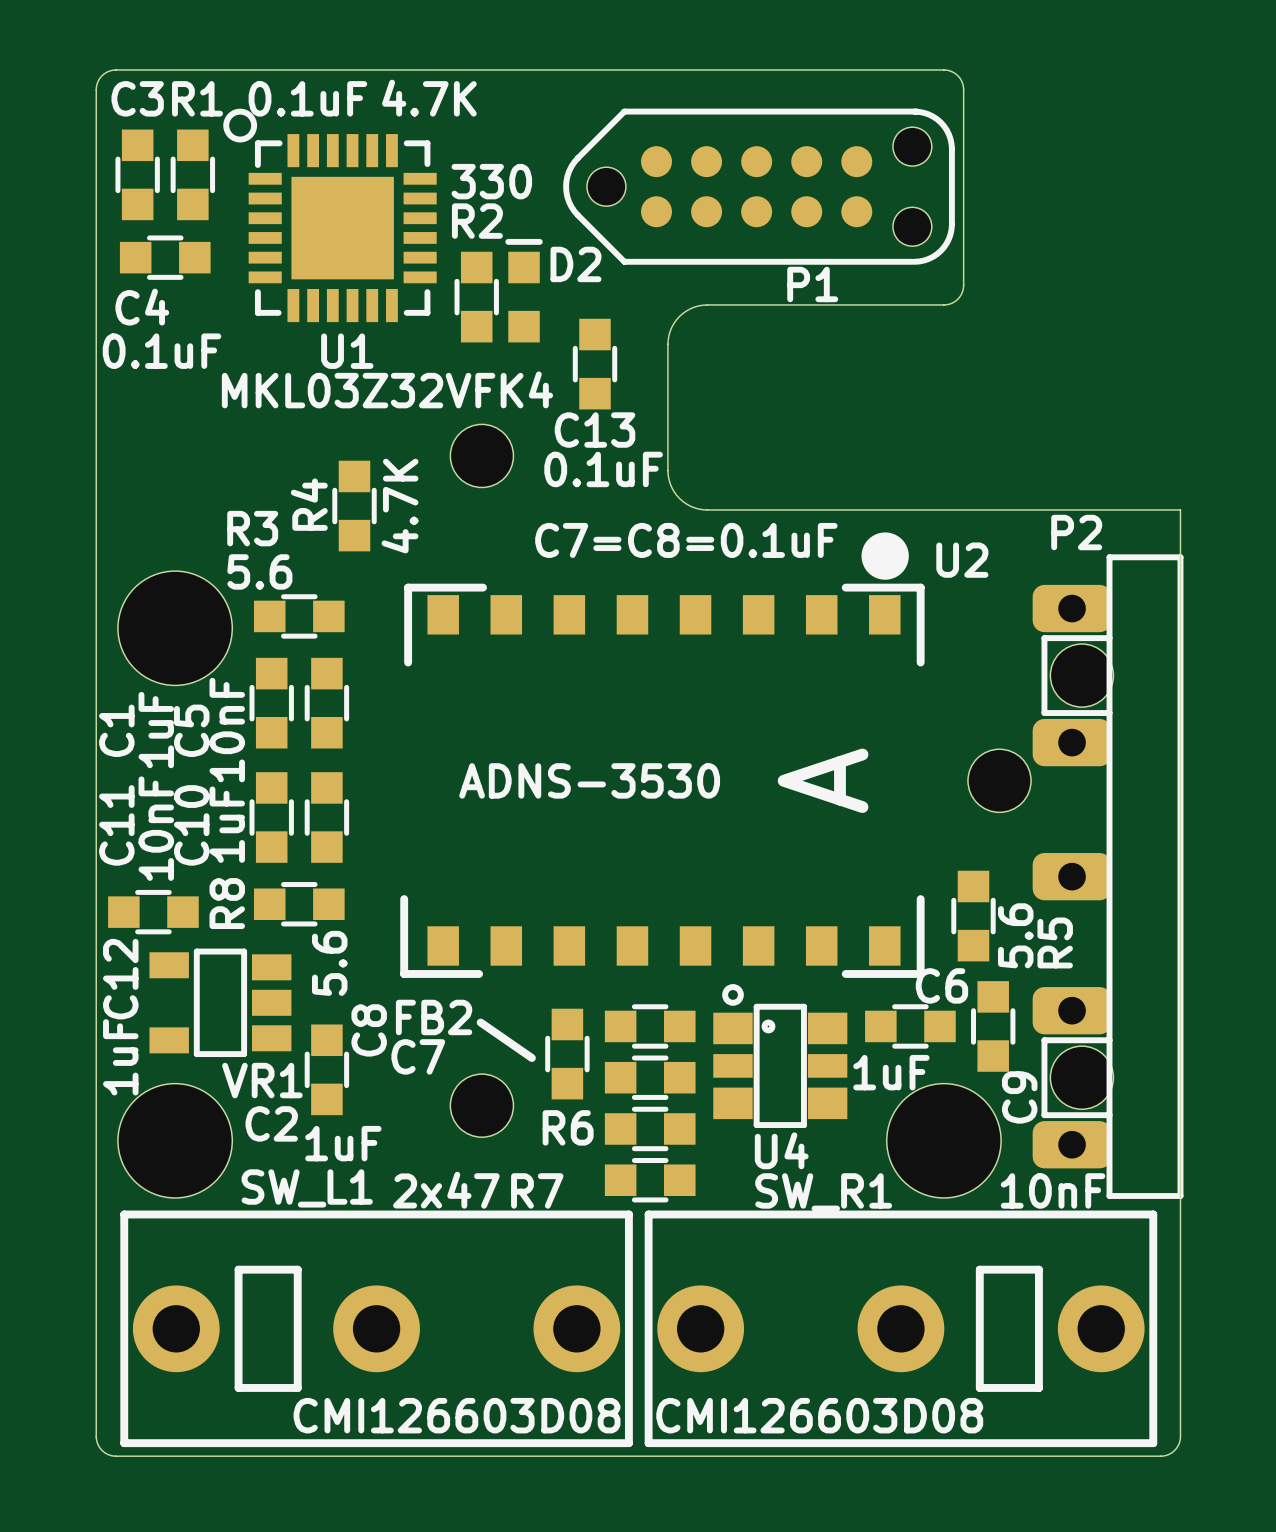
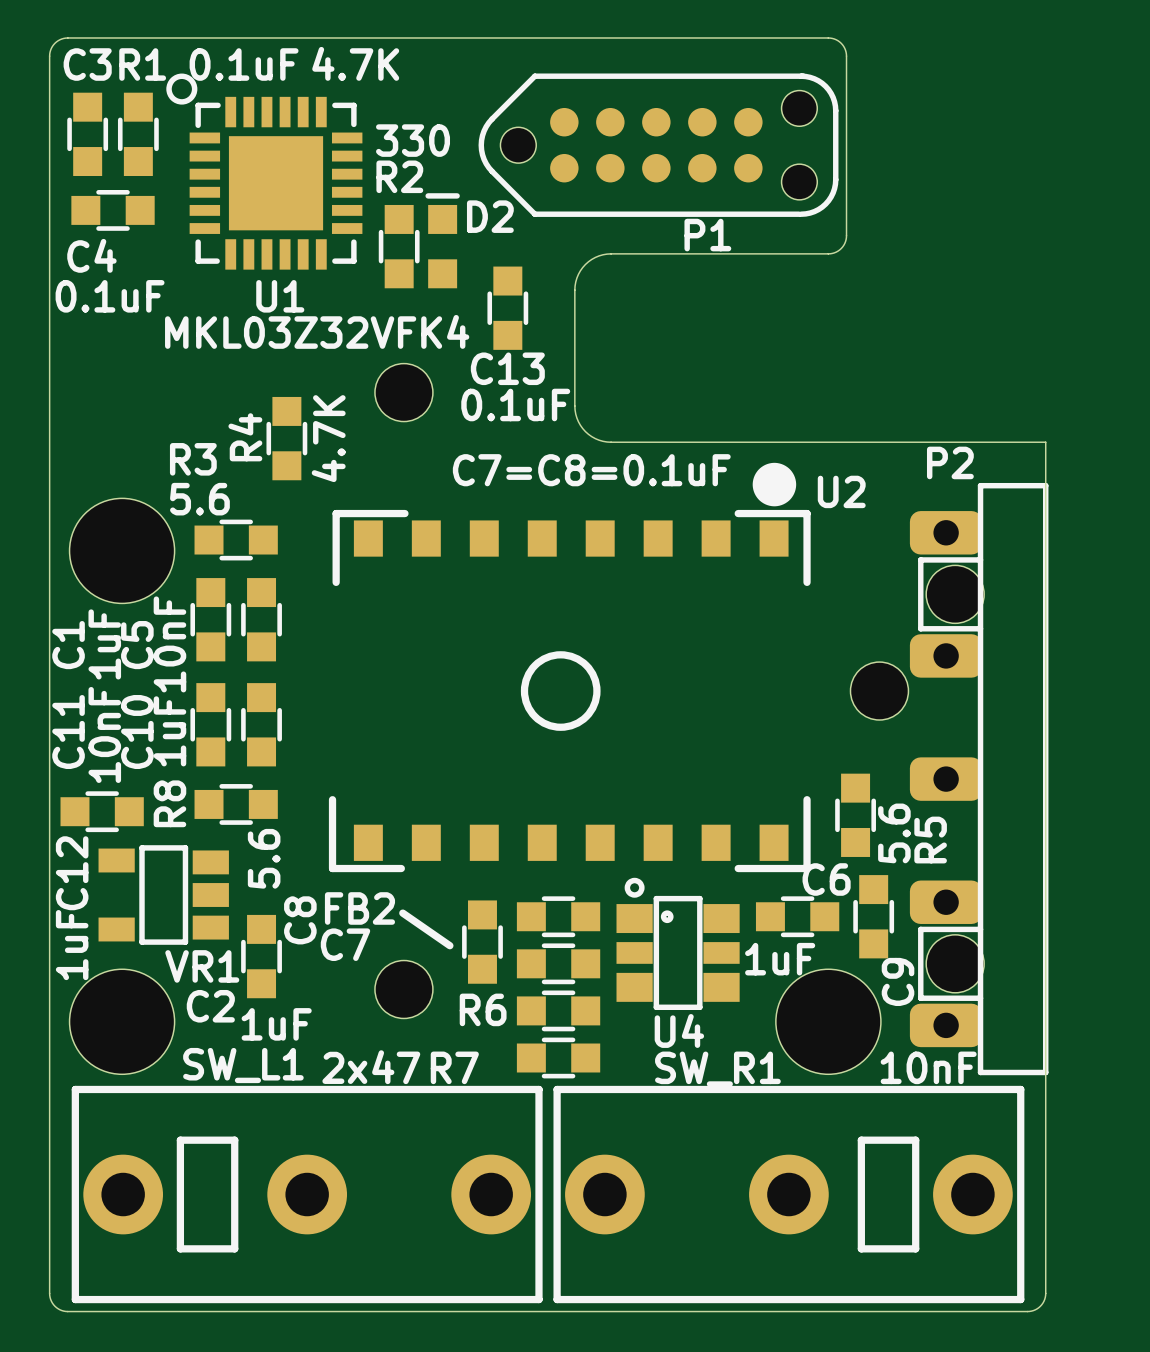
U2 footprint: [400, 532, 925, 978] -> [328, 462, 811, 873]
U2 value: ADNS-3530 (589, 780) -> none
SW_L1 value: CMI126603D08 (457, 1415) -> none
SW_R1 value: CMI126603D08 (819, 1415) -> none

